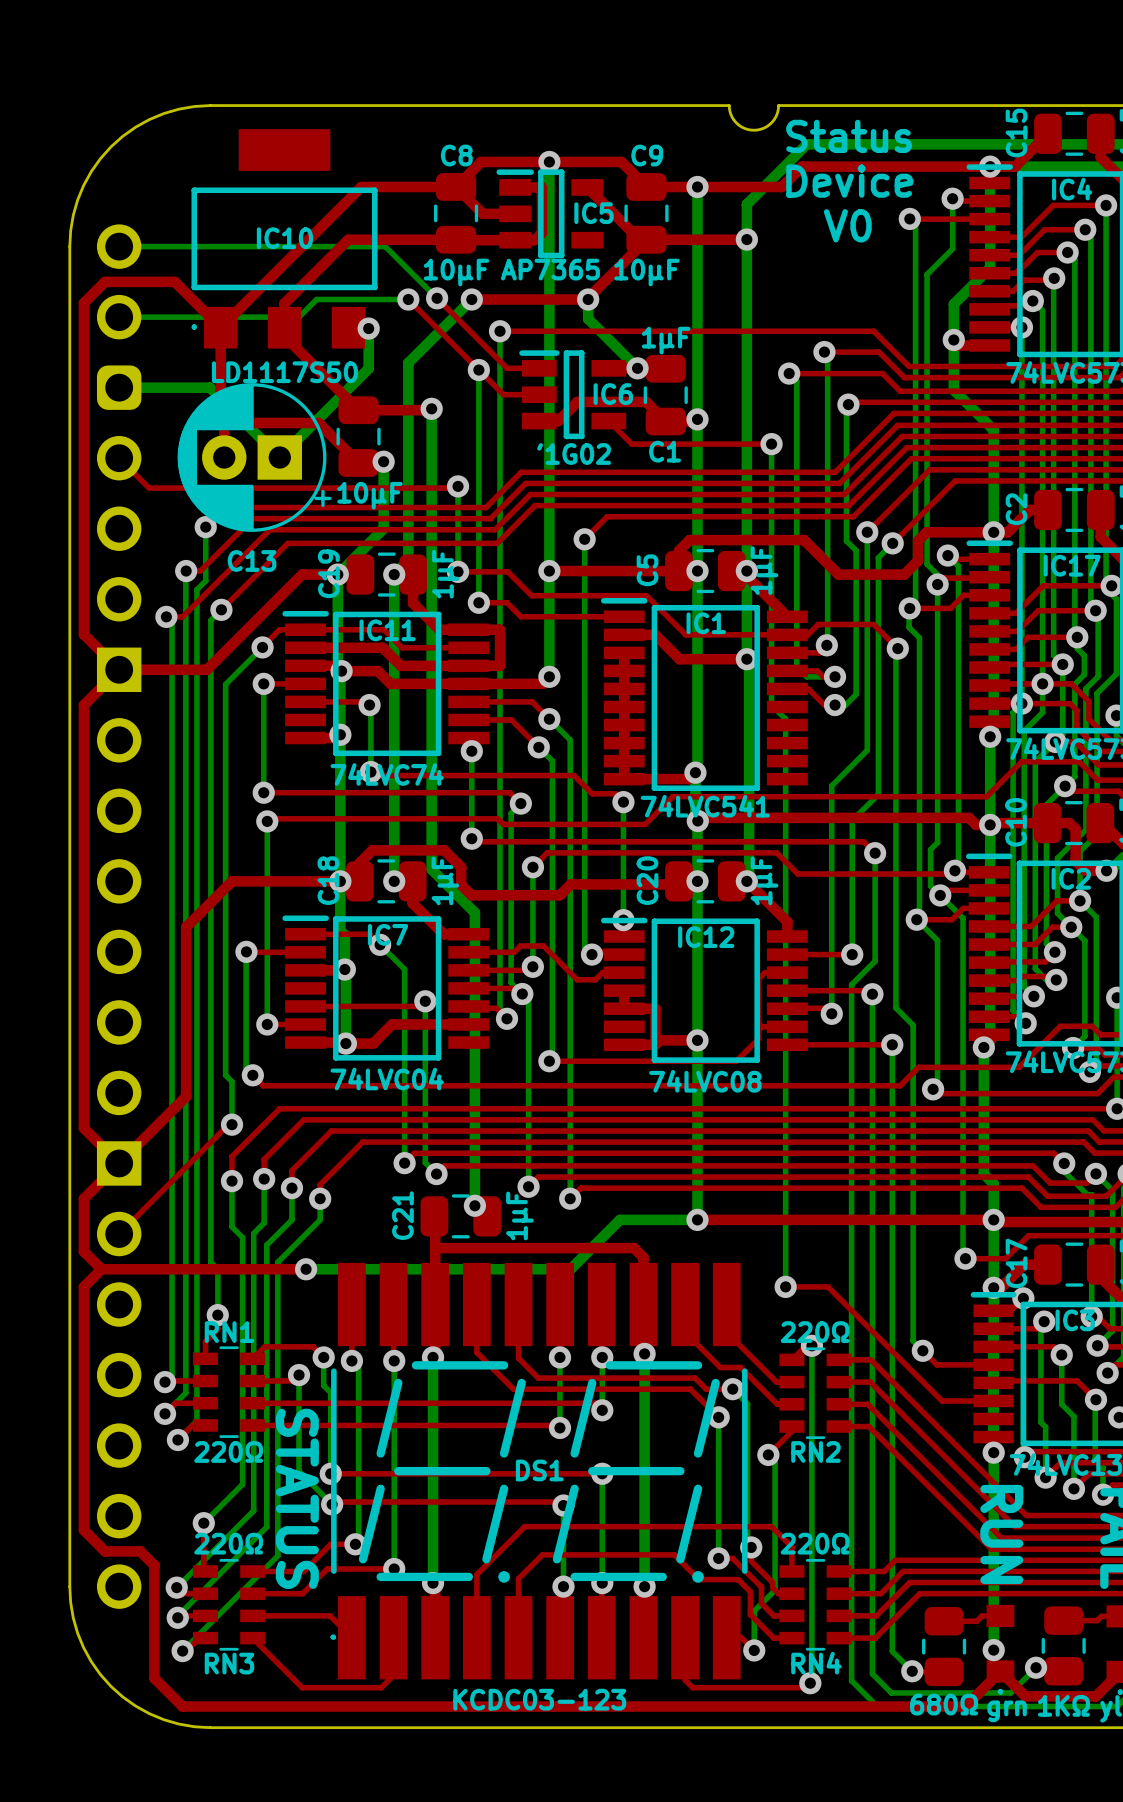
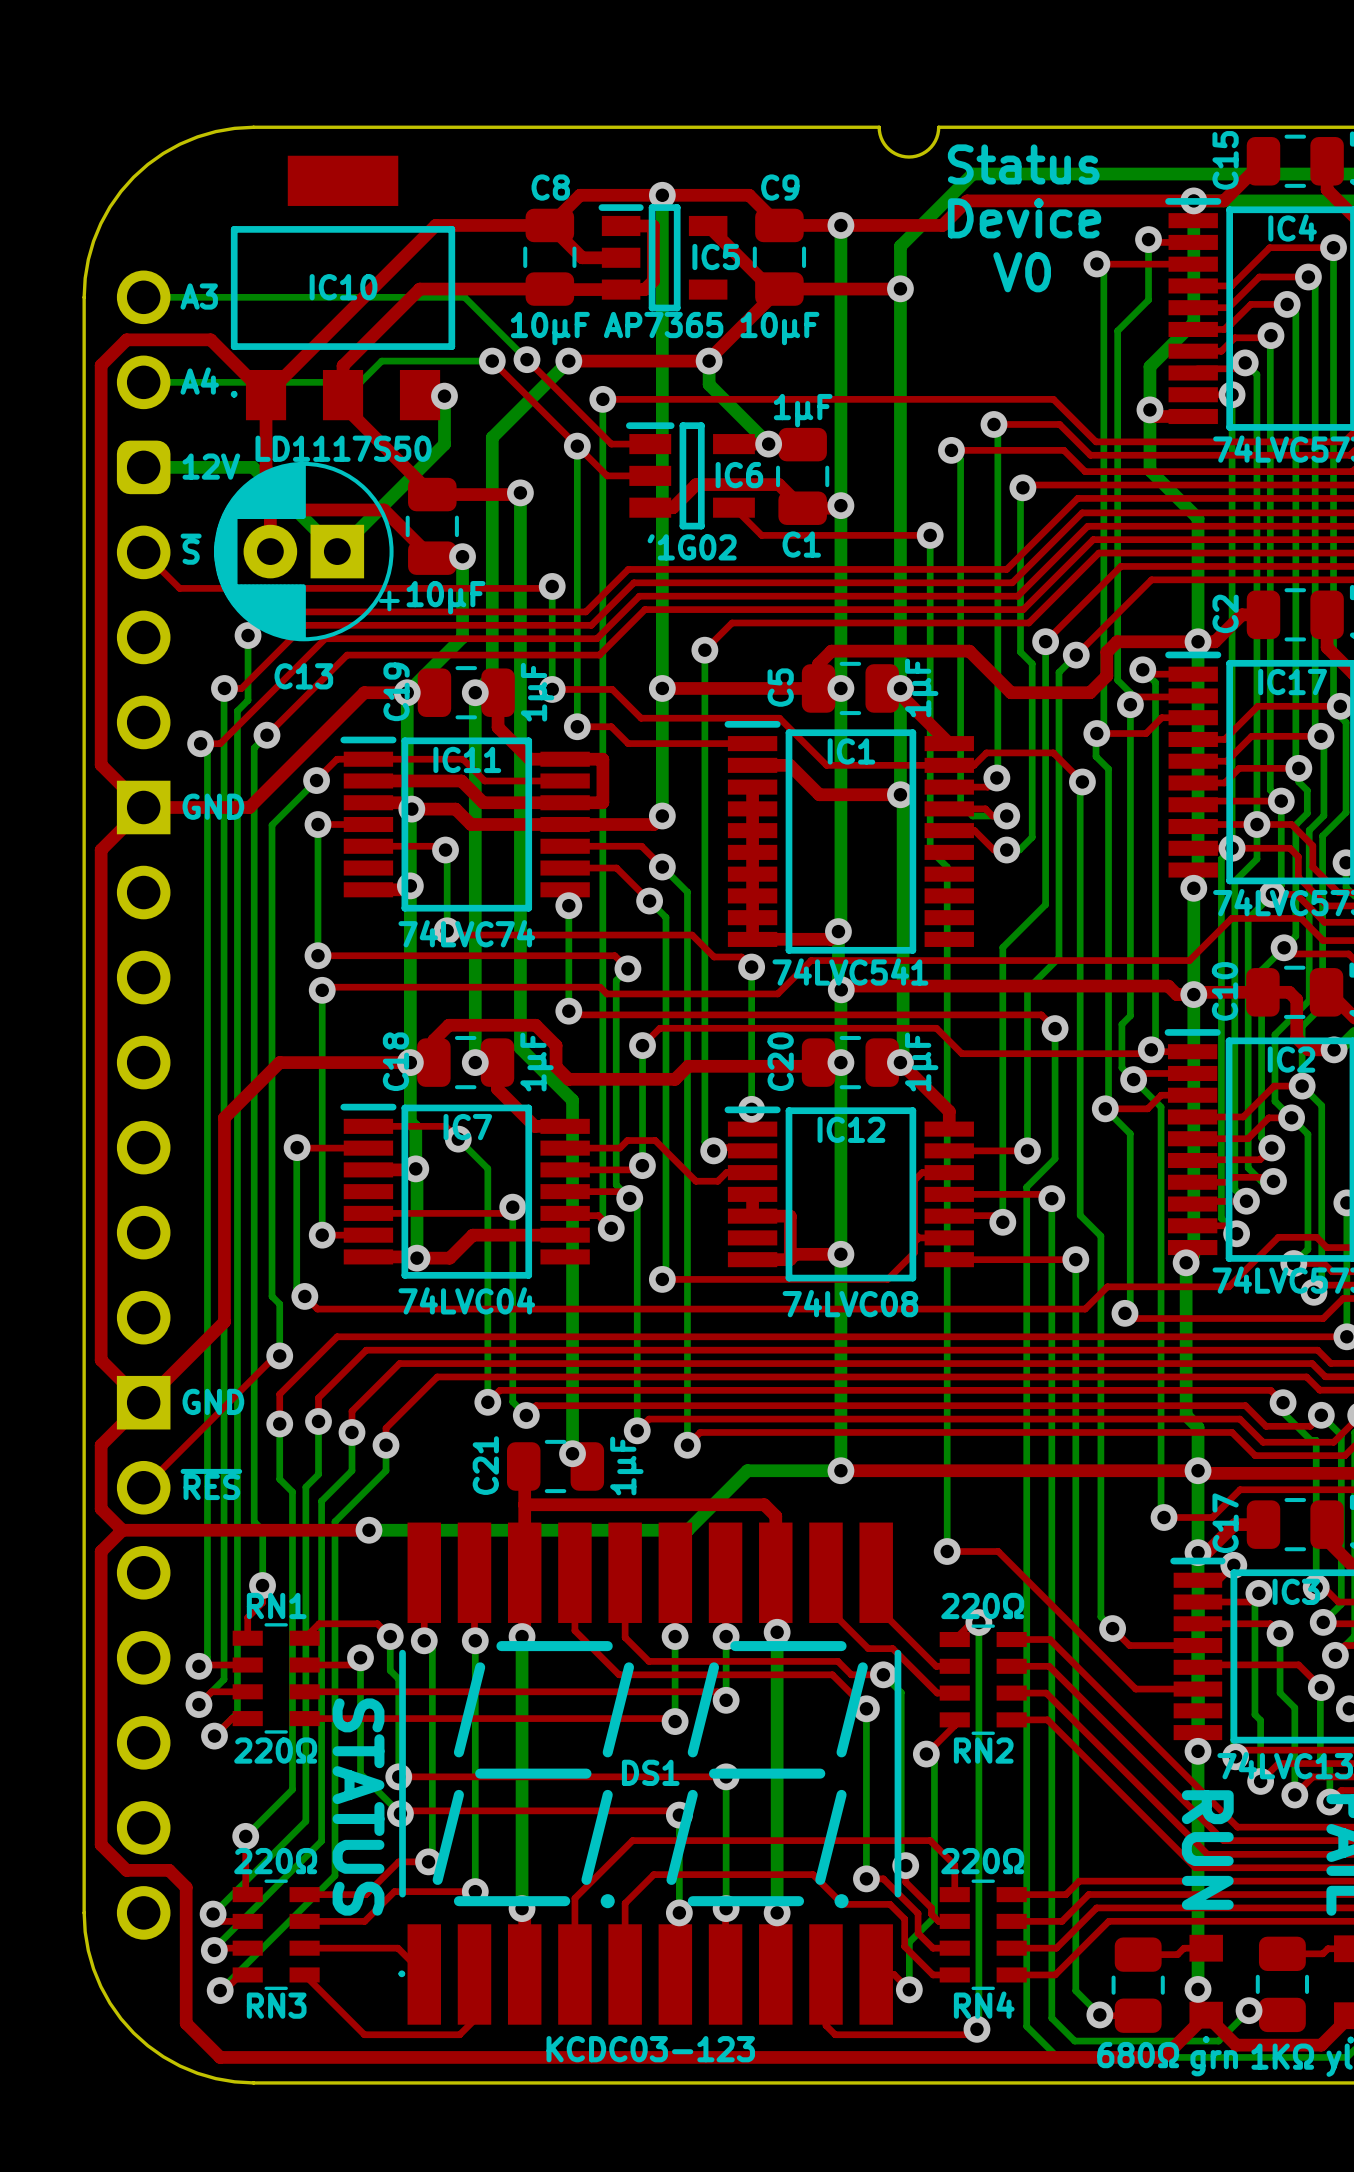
text: none -> A3 (199, 296)
text: none -> A4 (199, 381)
text: none -> 12V (211, 466)
text: none -> ~{S} (191, 549)
text: none -> GND (213, 806)
text: none -> GND (213, 1401)
text: none -> ~{RES} (211, 1484)

